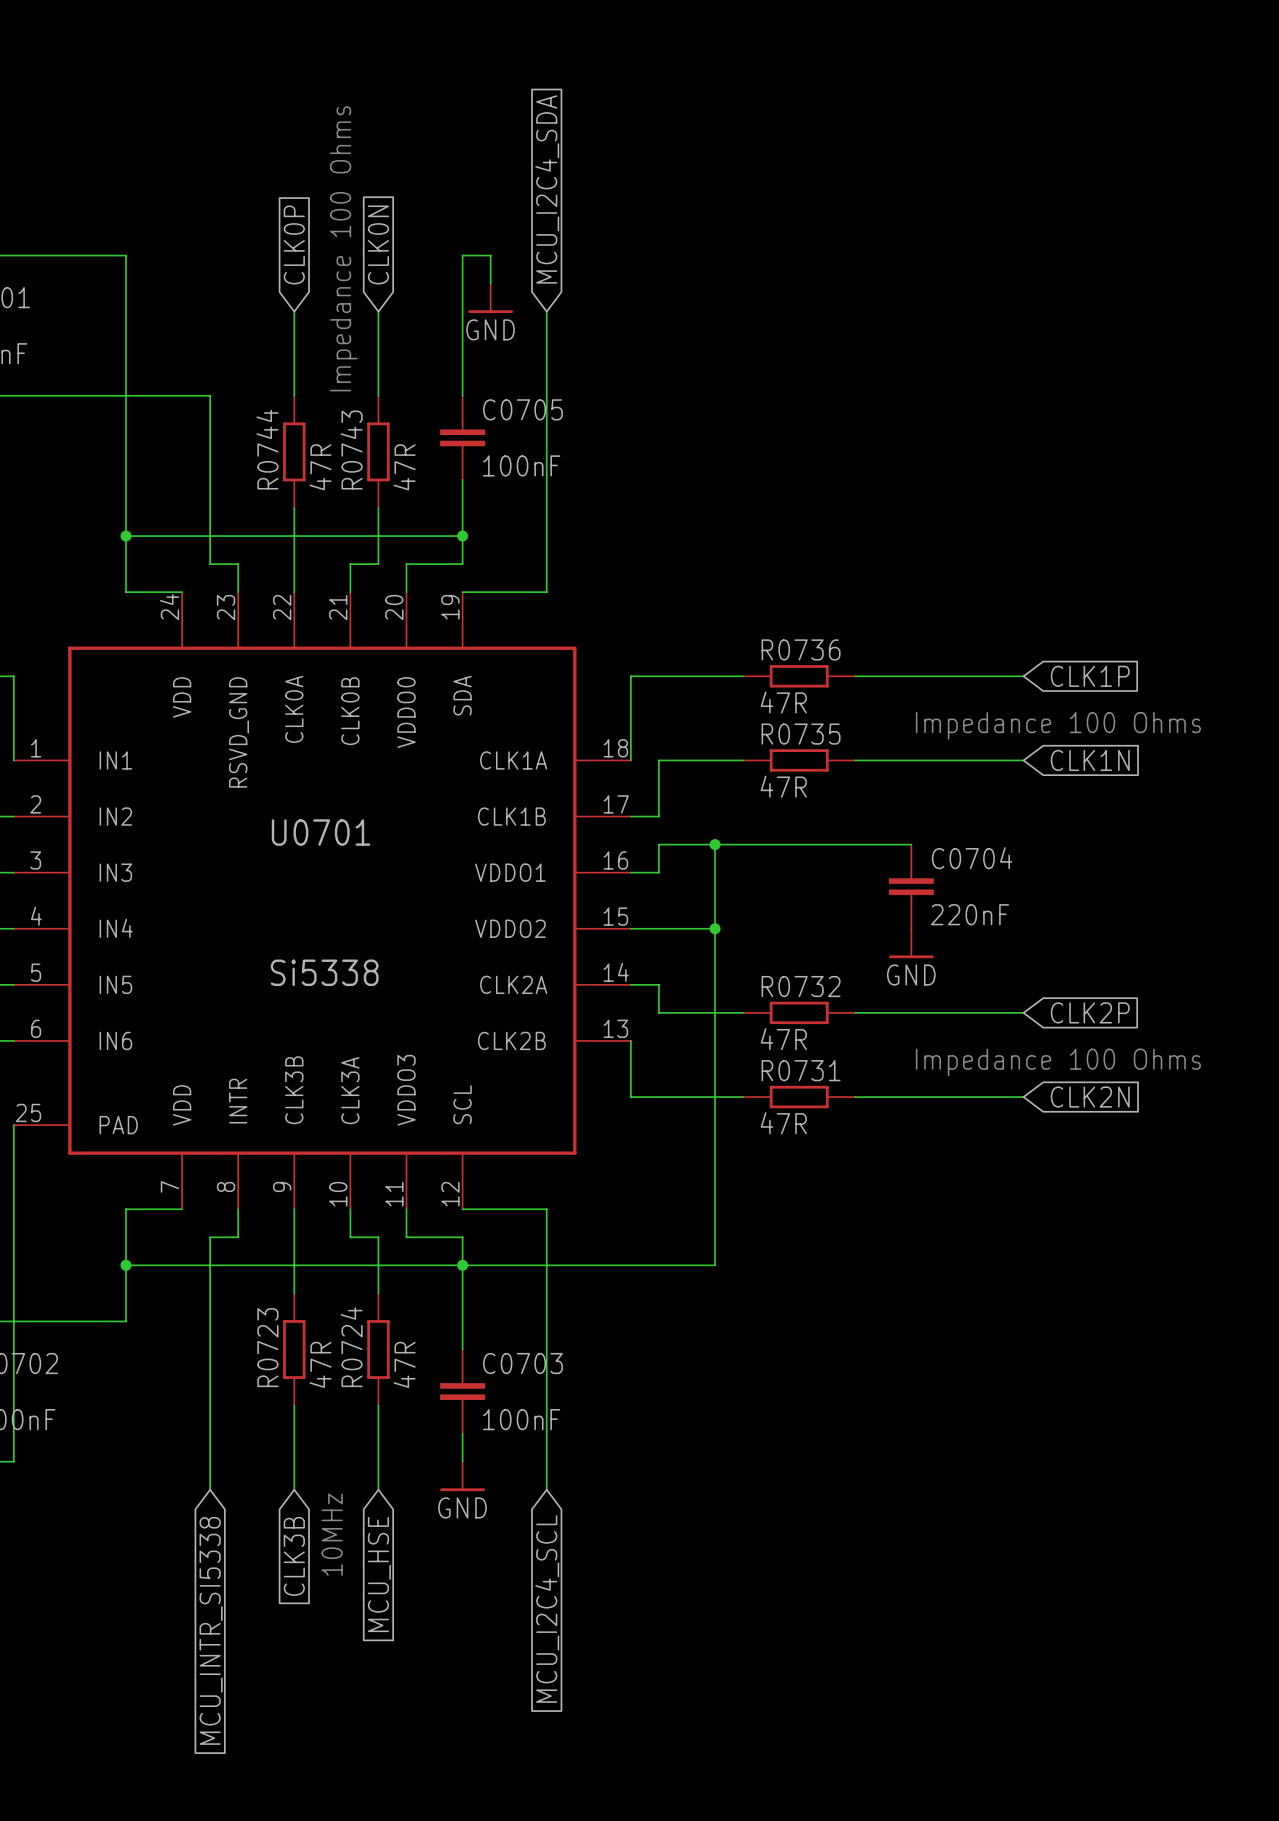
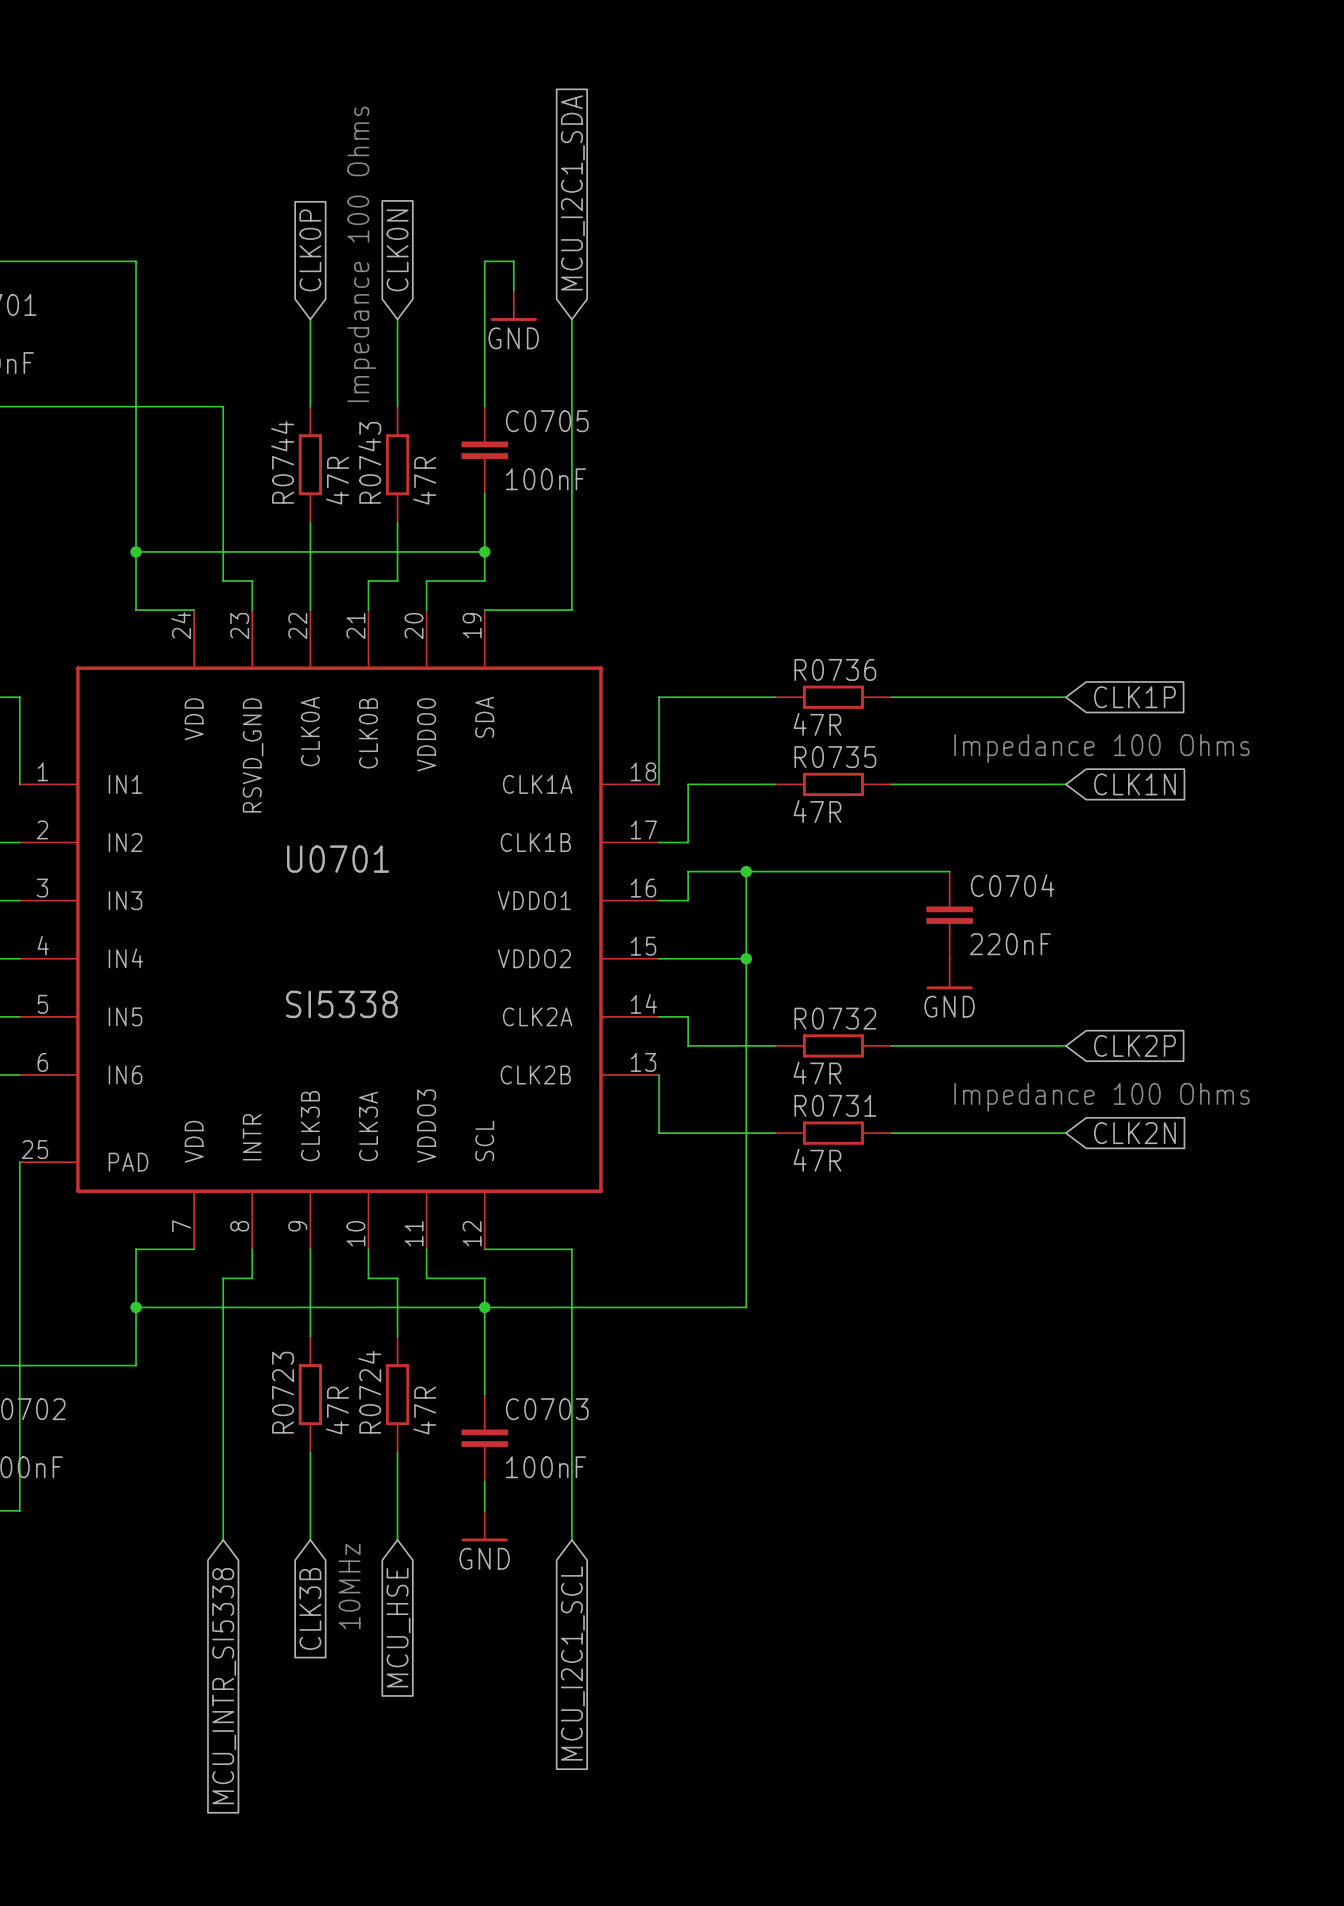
global label: MCU_I2C4_SDA (547, 189) -> MCU_I2C1_SDA (572, 192)
U0701 value: Si5338 (324, 972) -> SI5338 (341, 1004)
global label: MCU_I2C4_SCL (547, 1609) -> MCU_I2C1_SCL (572, 1663)

